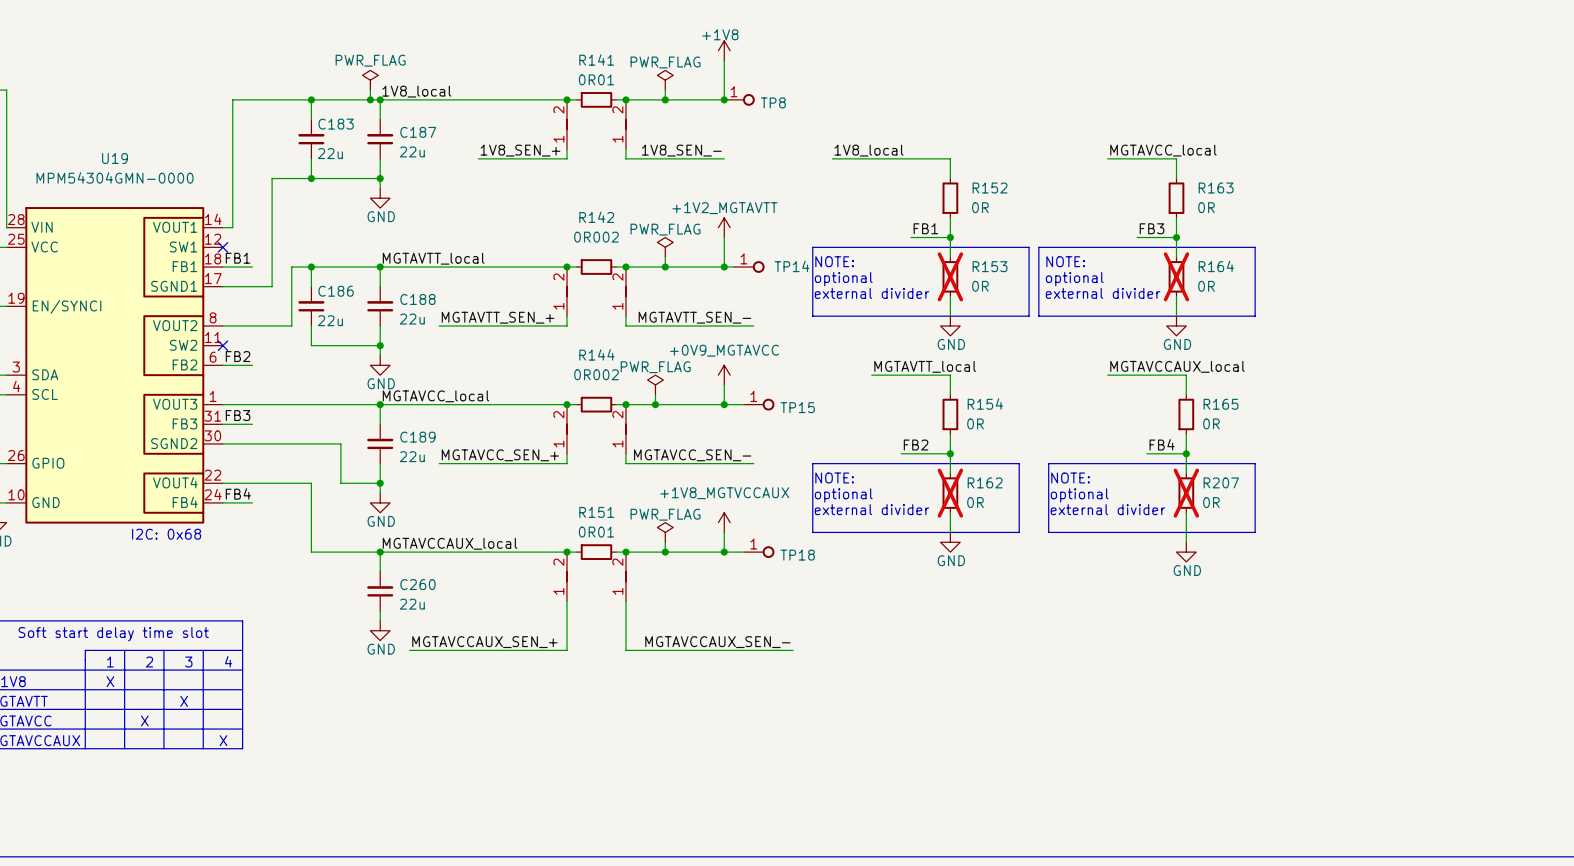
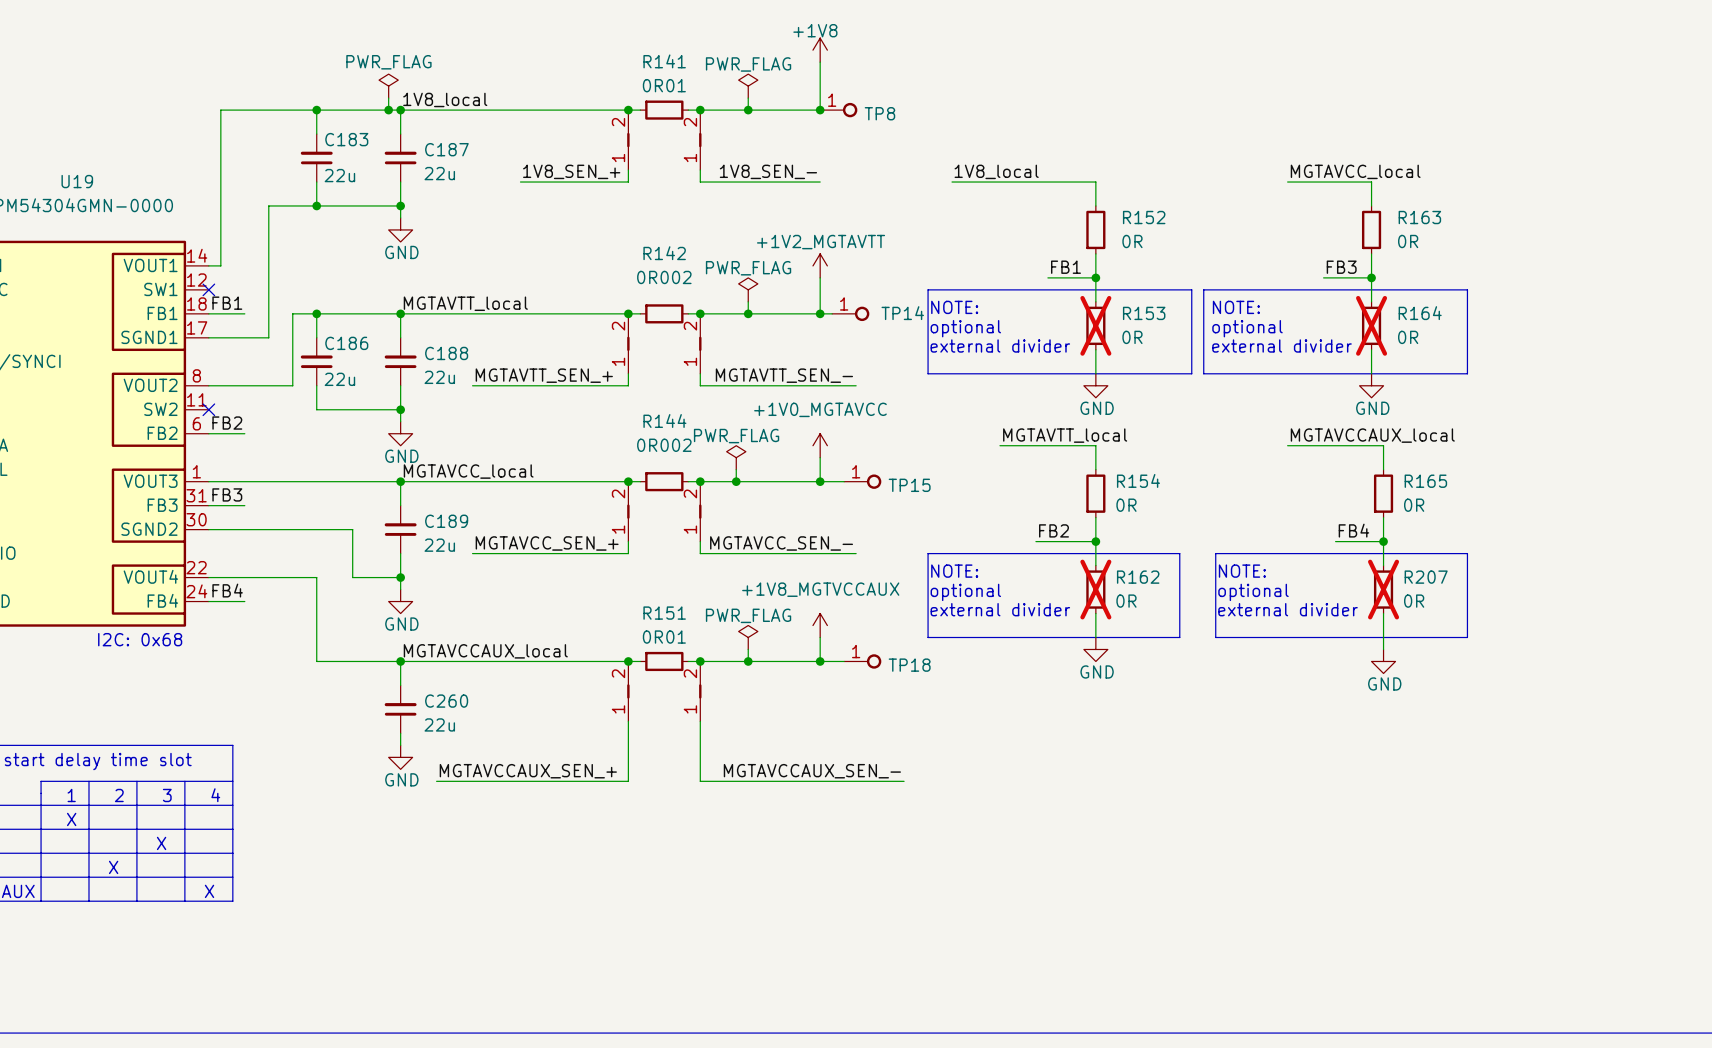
power symbol: +0V9_MGTAVCC (724, 375) -> +1V0_MGTAVCC (820, 445)

